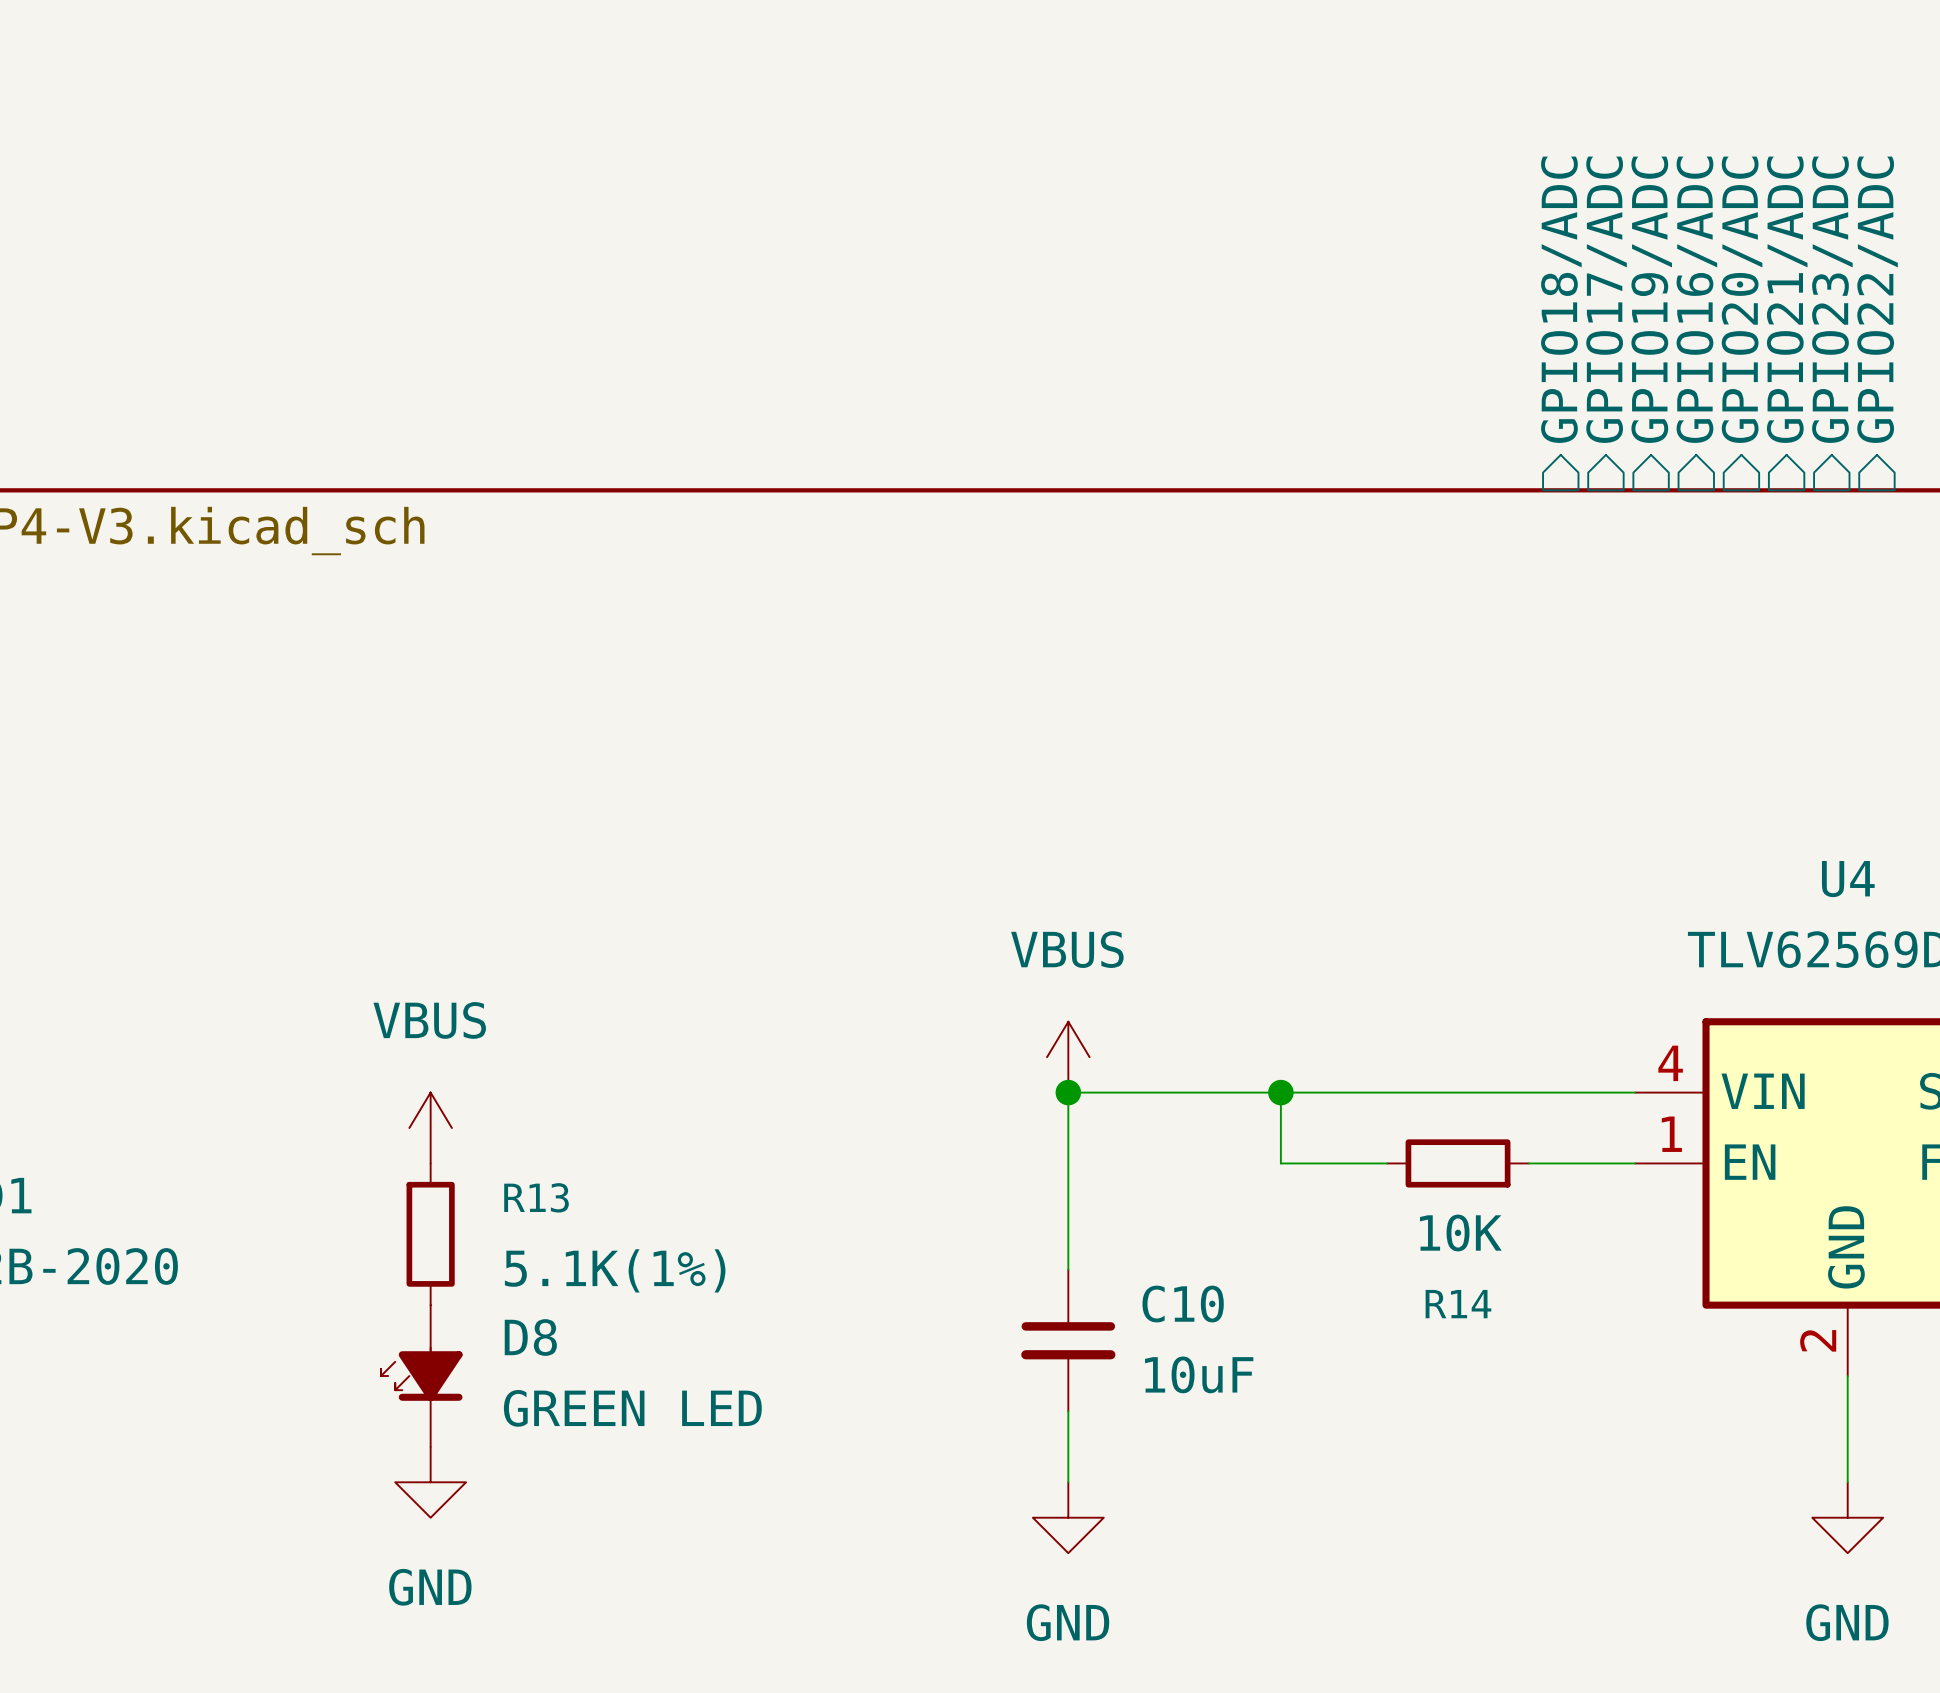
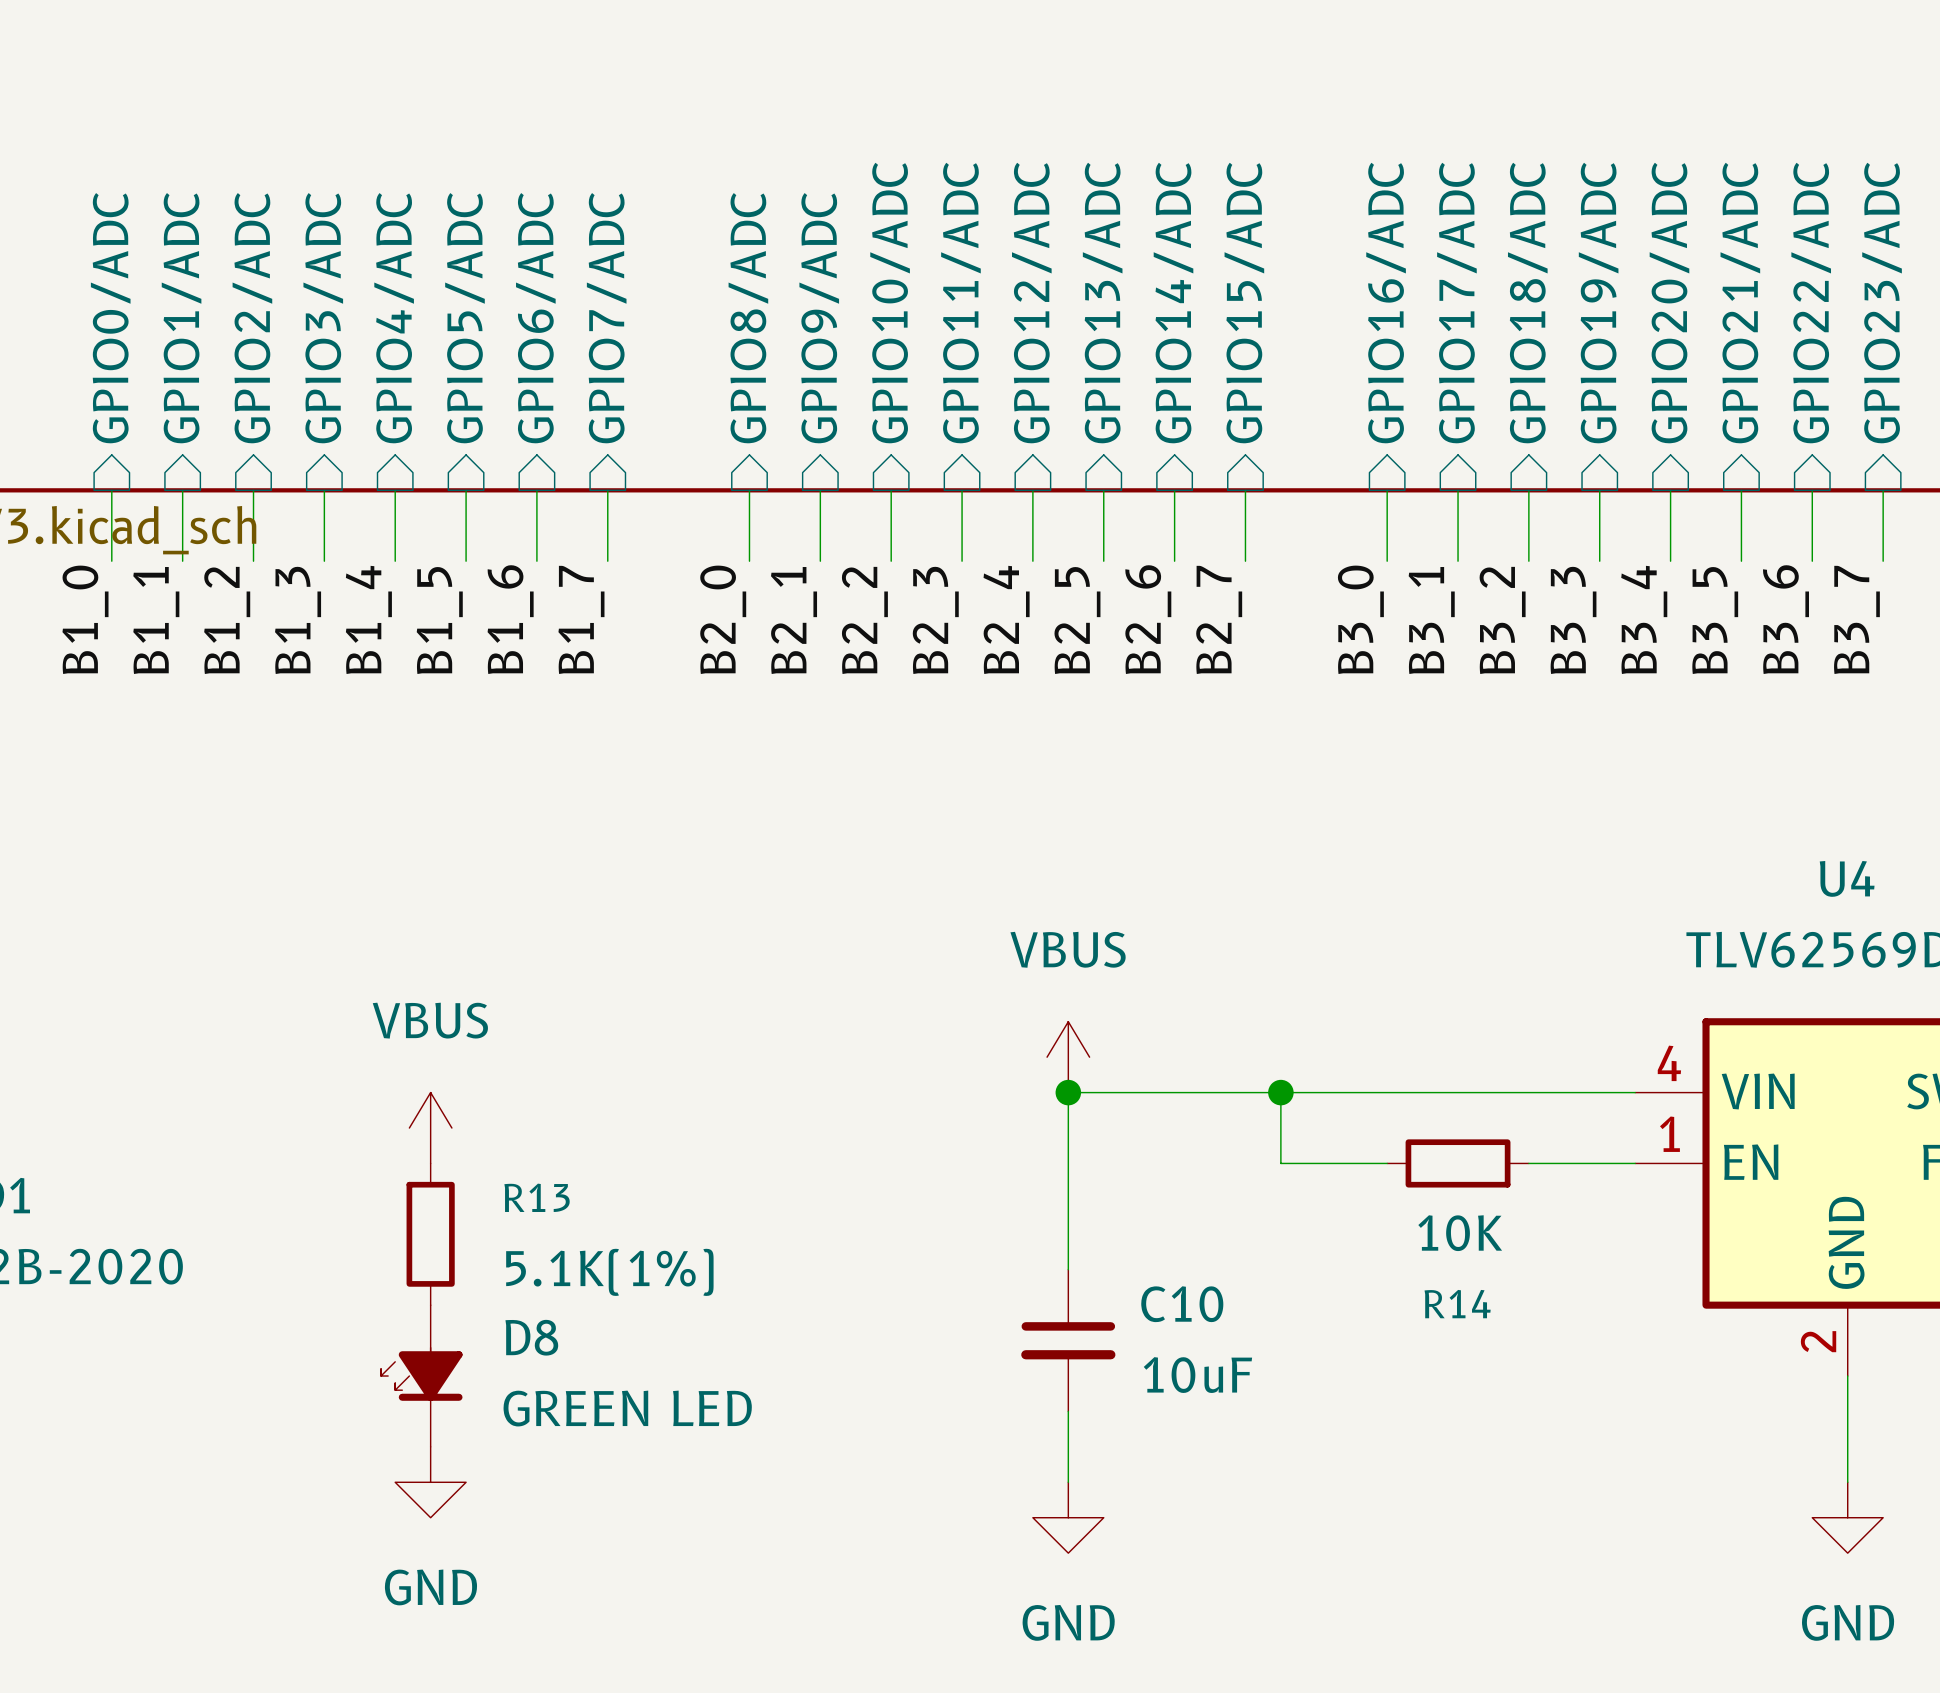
sheet pin: none -> GPIO10/ADC (890, 303)
sheet pin: none -> GPIO11/ADC (960, 303)
sheet pin: none -> GPIO12/ADC (1031, 303)
sheet pin: none -> GPIO13/ADC (1102, 303)
sheet pin: none -> GPIO14/ADC (1173, 303)
sheet pin: none -> GPIO15/ADC (1244, 303)
sheet pin position: GPIO18/ADC (1561, 299) -> GPIO18/ADC (1527, 303)
sheet pin position: GPIO17/ADC (1606, 299) -> GPIO17/ADC (1456, 303)
sheet pin position: GPIO19/ADC (1651, 299) -> GPIO19/ADC (1598, 303)
sheet pin: none -> GPIO20/ADC (1669, 303)
sheet pin position: GPIO16/ADC (1696, 299) -> GPIO16/ADC (1386, 303)
sheet pin: GPIO20/ADC (1742, 299) -> GPIO21/ADC (1740, 303)
sheet pin: GPIO21/ADC (1787, 299) -> none
sheet pin position: GPIO23/ADC (1832, 299) -> GPIO23/ADC (1882, 303)
sheet pin position: GPIO22/ADC (1877, 299) -> GPIO22/ADC (1811, 303)
sheet pin: none -> GPIO0/ADC (110, 318)
sheet pin: none -> GPIO1/ADC (181, 318)
sheet pin: none -> GPIO2/ADC (252, 318)
sheet pin: none -> GPIO3/ADC (323, 318)
sheet pin: none -> GPIO4/ADC (394, 318)
sheet pin: none -> GPIO5/ADC (464, 318)
sheet pin: none -> GPIO6/ADC (535, 318)
sheet pin: none -> GPIO7/ADC (606, 318)
sheet pin: none -> GPIO8/ADC (748, 318)
sheet pin: none -> GPIO9/ADC (819, 318)
wire: none -> (111, 490) (111, 561)
wire: none -> (182, 490) (182, 561)
wire: none -> (253, 490) (253, 561)
wire: none -> (324, 490) (324, 561)
wire: none -> (395, 490) (395, 561)
wire: none -> (466, 490) (466, 561)
wire: none -> (536, 490) (536, 561)
wire: none -> (607, 490) (607, 561)
wire: none -> (749, 490) (749, 561)
wire: none -> (820, 490) (820, 561)
wire: none -> (891, 490) (891, 561)
wire: none -> (962, 490) (962, 561)
wire: none -> (1032, 490) (1032, 561)
wire: none -> (1103, 490) (1103, 561)
wire: none -> (1174, 490) (1174, 561)
wire: none -> (1245, 490) (1245, 561)
wire: none -> (1387, 490) (1387, 561)
wire: none -> (1458, 490) (1458, 561)
wire: none -> (1528, 490) (1528, 561)
wire: none -> (1599, 490) (1599, 561)
wire: none -> (1670, 490) (1670, 561)
wire: none -> (1741, 490) (1741, 561)
wire: none -> (1812, 490) (1812, 561)
wire: none -> (1883, 490) (1883, 561)
label: none -> B1_4 (368, 619)
label: none -> B2_4 (1006, 619)
label: none -> B3_4 (1644, 619)
label: none -> B1_0 (85, 619)
label: none -> B1_1 (156, 620)
label: none -> B1_2 (227, 620)
label: none -> B1_3 (298, 620)
label: none -> B1_5 (439, 620)
label: none -> B1_6 (510, 619)
label: none -> B1_7 (581, 619)
label: none -> B2_0 (723, 619)
label: none -> B2_1 (794, 620)
label: none -> B2_2 (864, 620)
label: none -> B2_3 (935, 620)
label: none -> B2_5 (1077, 620)
label: none -> B2_6 (1148, 619)
label: none -> B2_7 (1219, 619)
label: none -> B3_0 (1360, 619)
label: none -> B3_1 (1431, 620)
label: none -> B3_2 (1502, 620)
label: none -> B3_3 (1573, 620)
label: none -> B3_5 (1715, 620)
label: none -> B3_6 (1786, 619)
label: none -> B3_7 (1856, 619)

